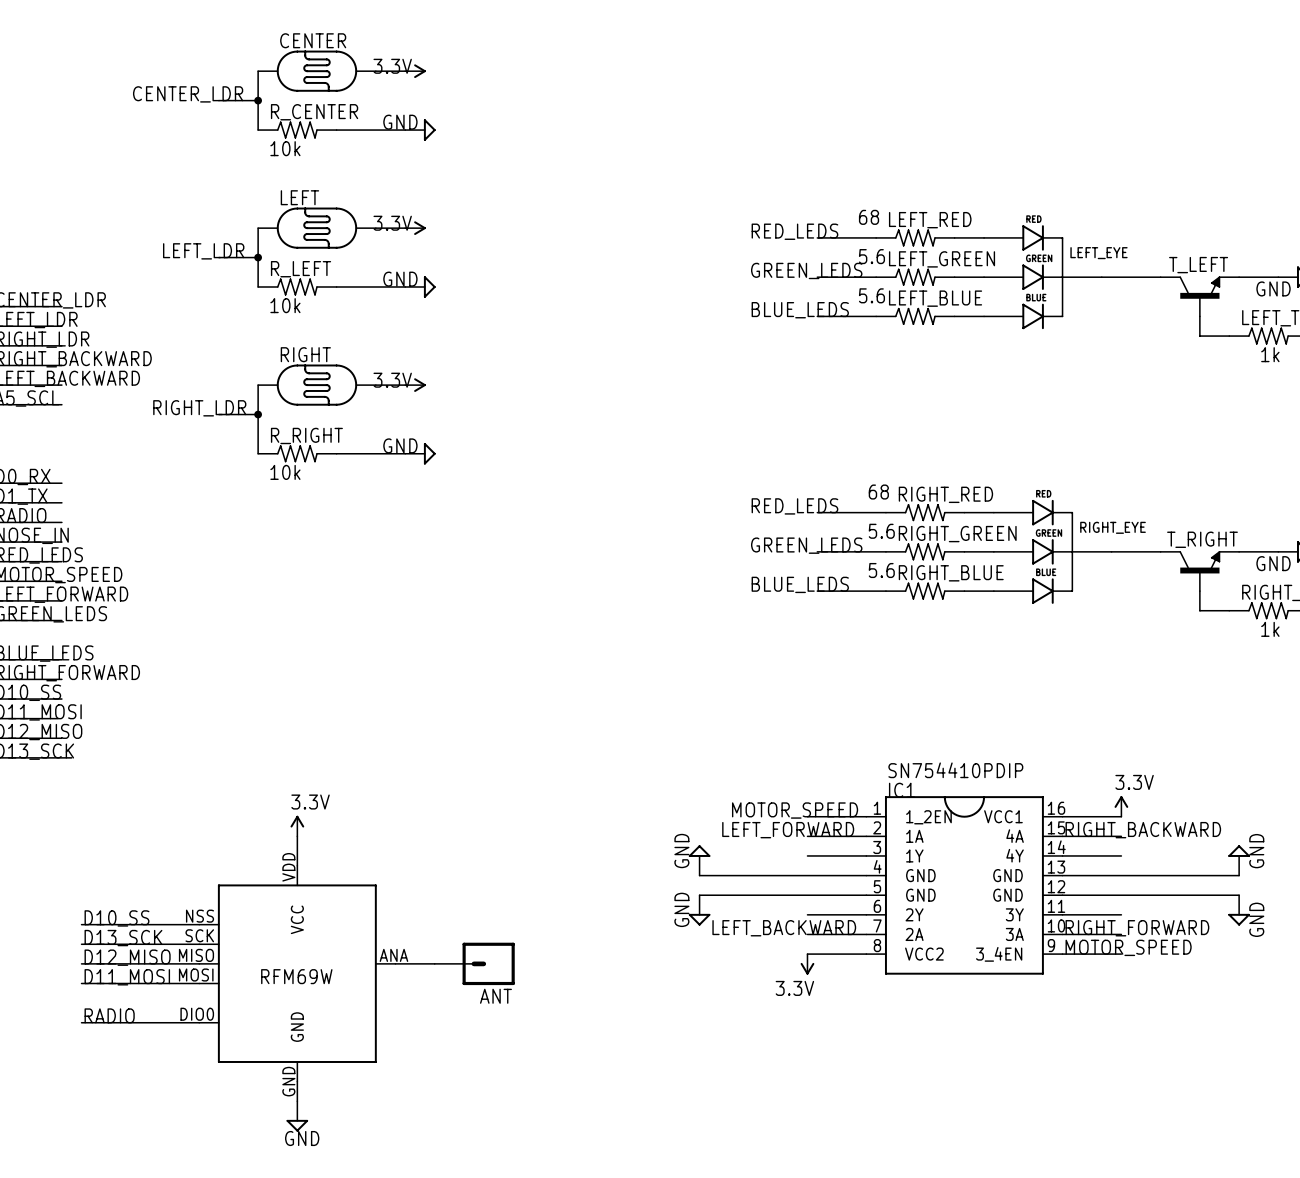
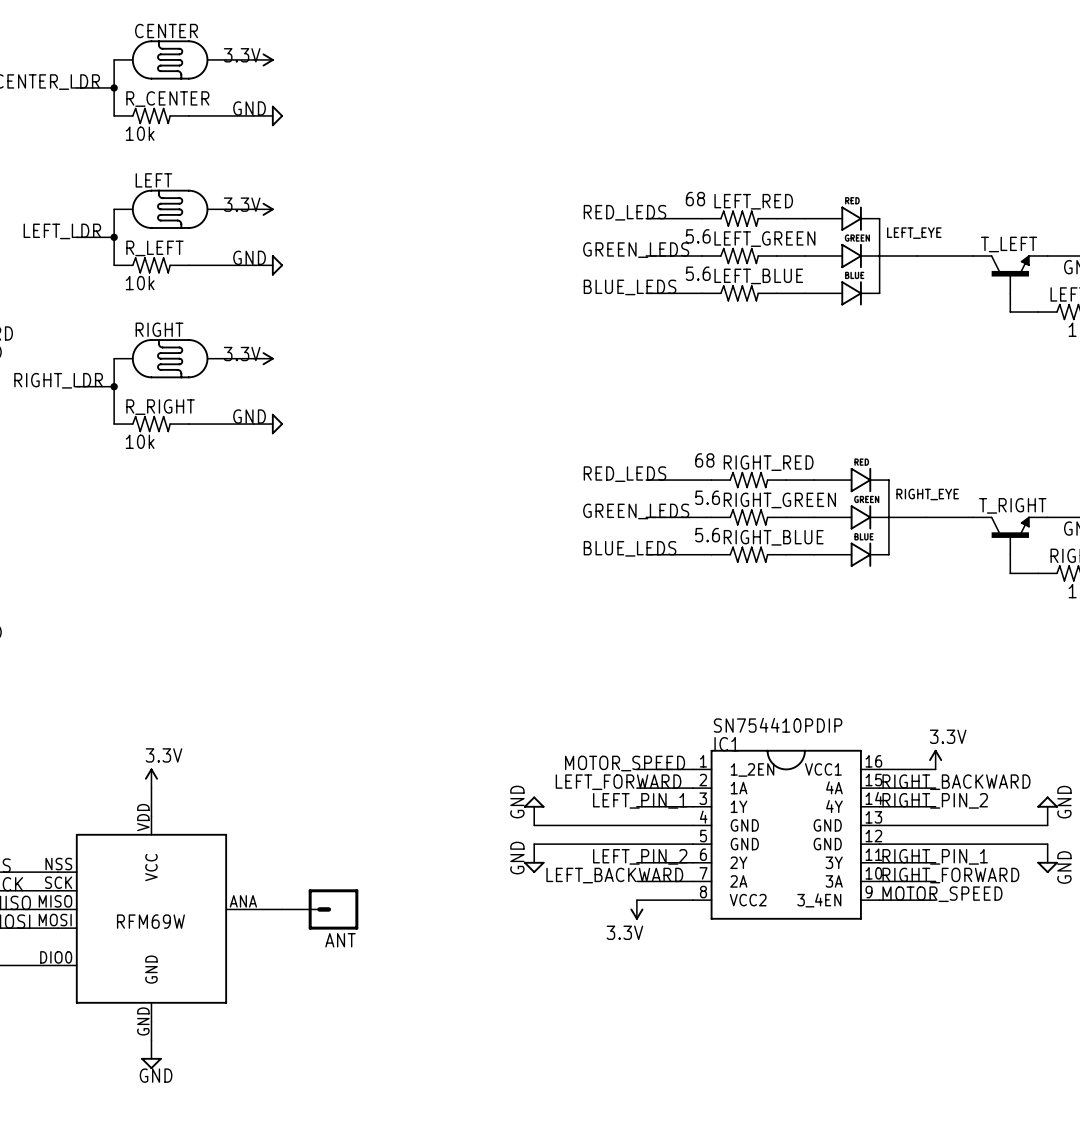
label: none -> LEFT_PIN_1 (640, 800)
label: none -> RIGHT_PIN_2 (935, 800)
label: none -> LEFT_PIN_2 (640, 856)
label: none -> RIGHT_PIN_1 (935, 856)

